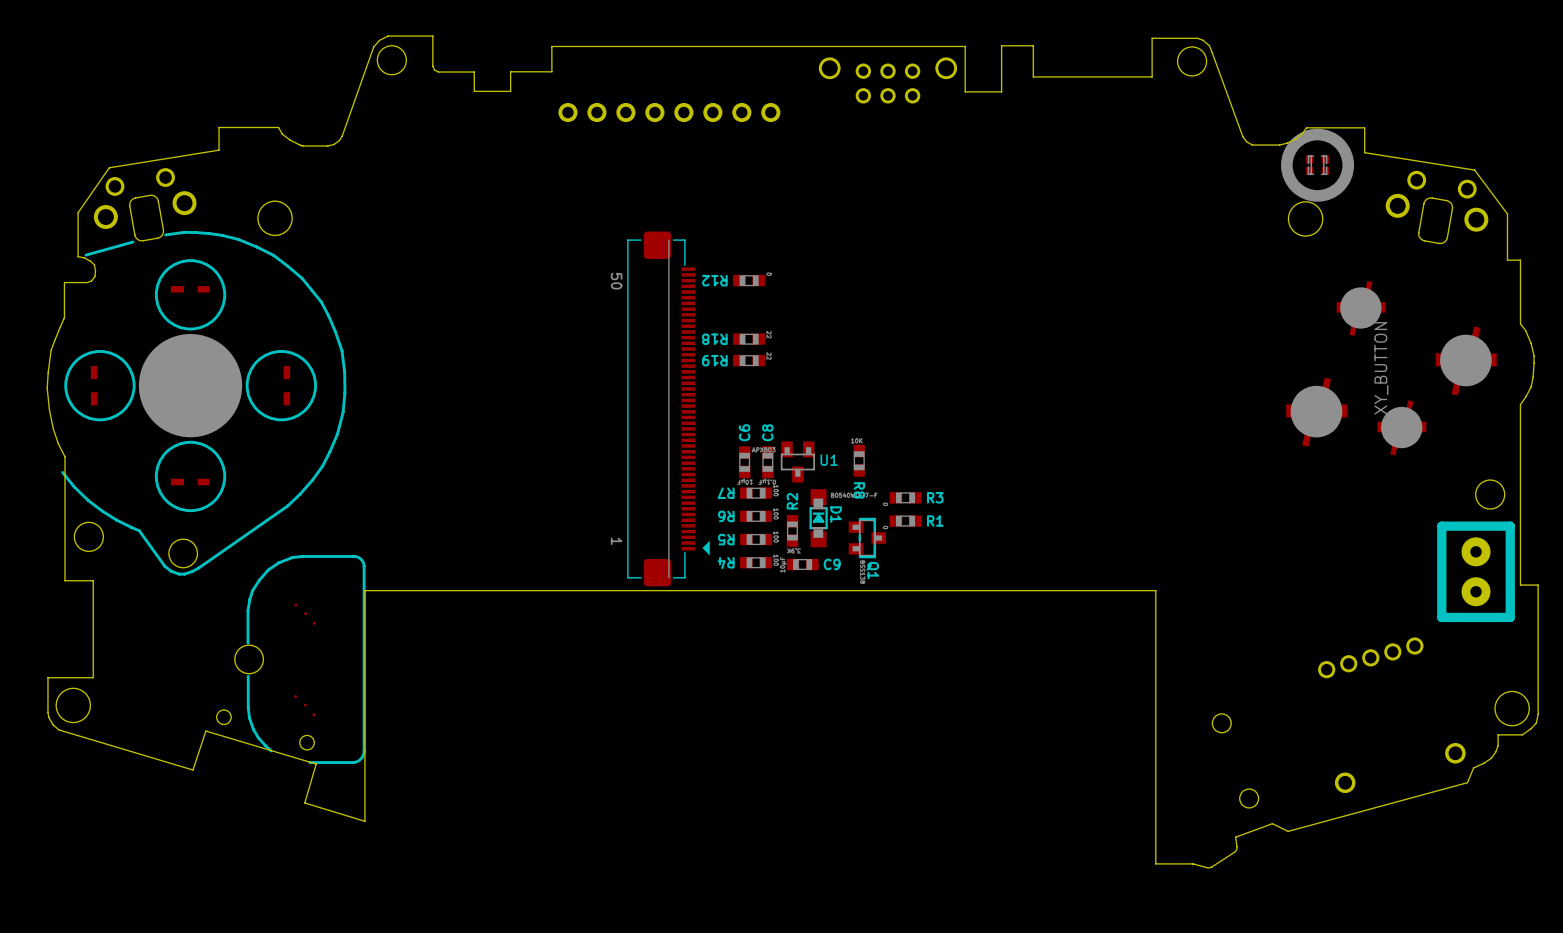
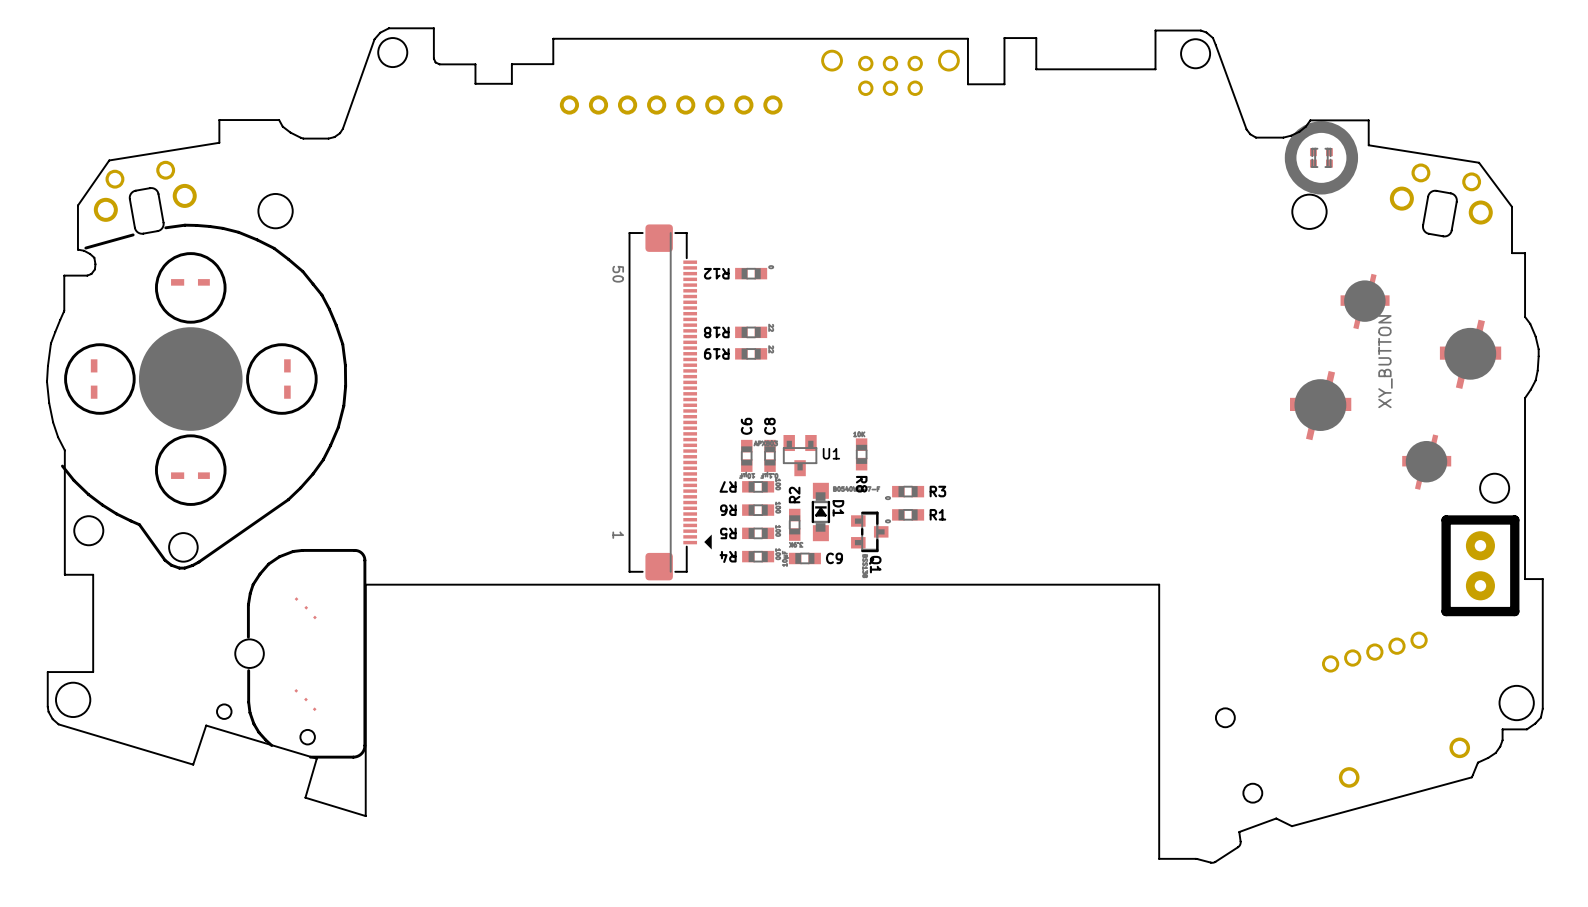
part: XY_BUTTON (1381, 368) -> none
part: none -> XY_BUTTON (1395, 381)

